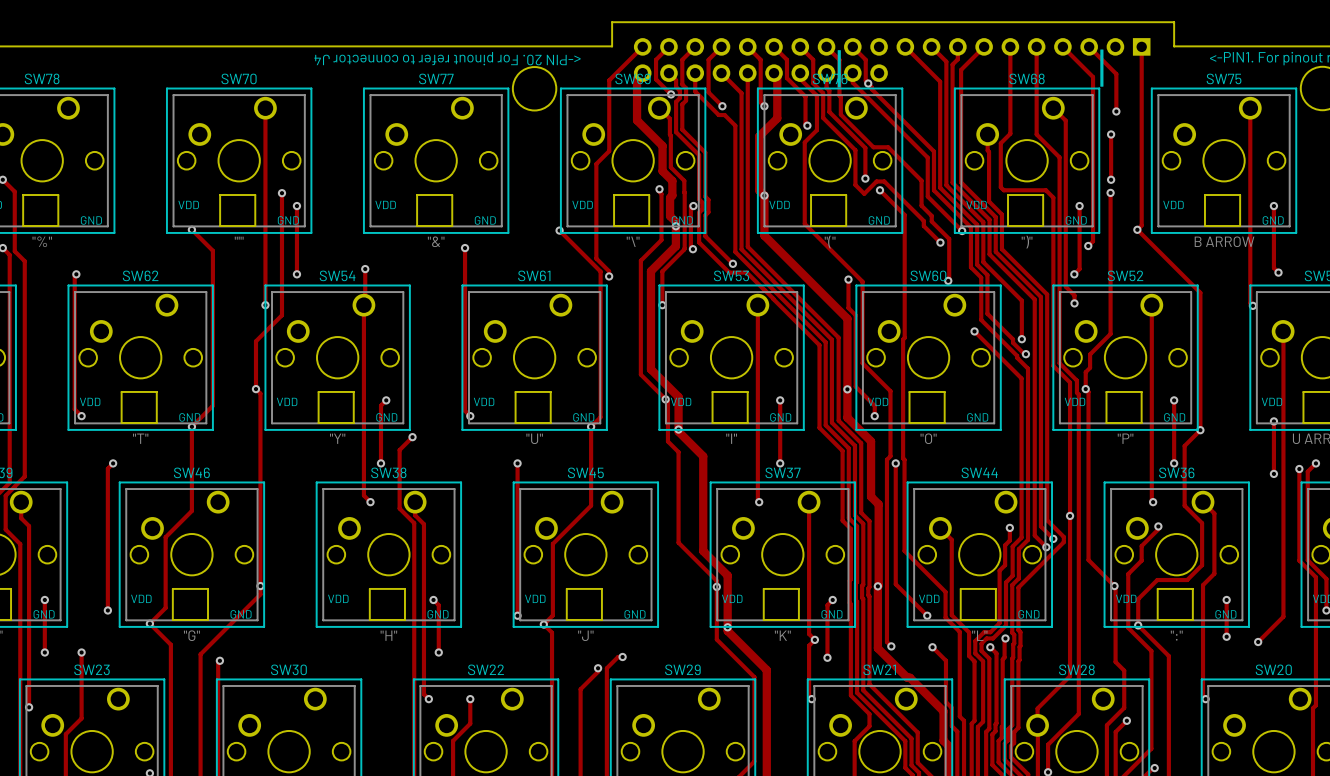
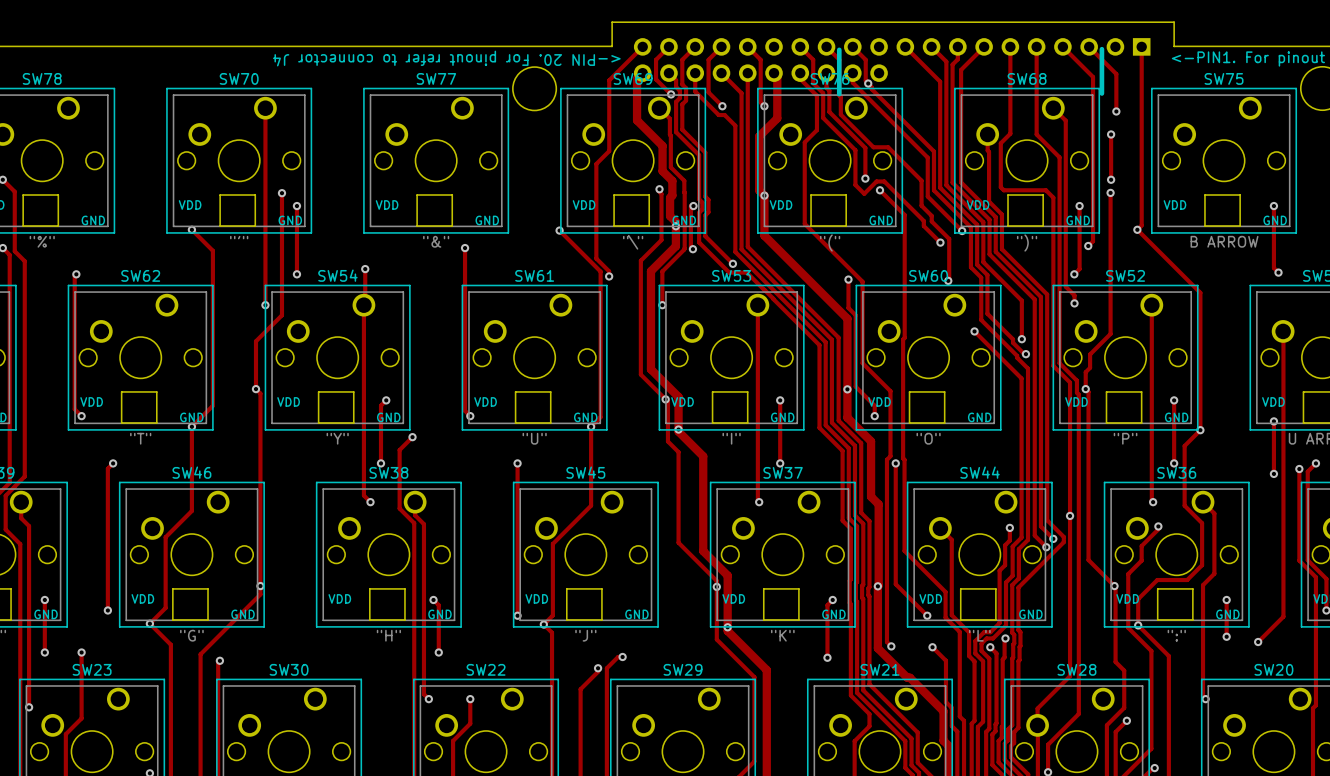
track: (774, 46) (786, 59) (786, 78) (805, 96) (805, 123) (807, 125) -> none
track: (1250, 108) (1250, 303) (1252, 305) -> none
via: (807, 125) -> none
via: (1252, 305) -> none
track: (809, 502) (809, 634) (814, 639) (809, 645) (809, 696) (811, 699) -> none
via: (814, 639) -> none
via: (811, 699) -> none

